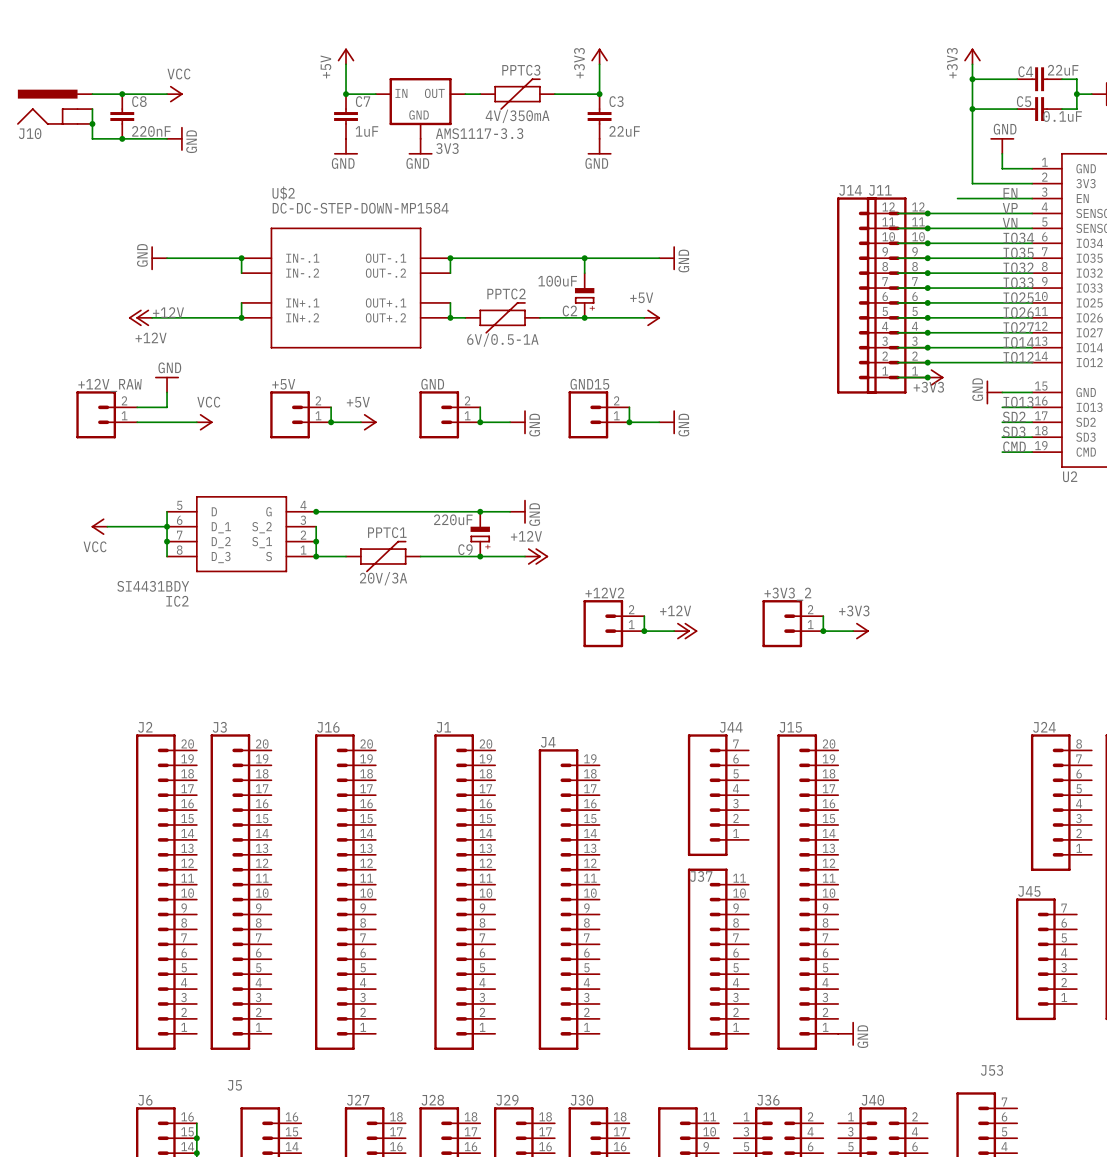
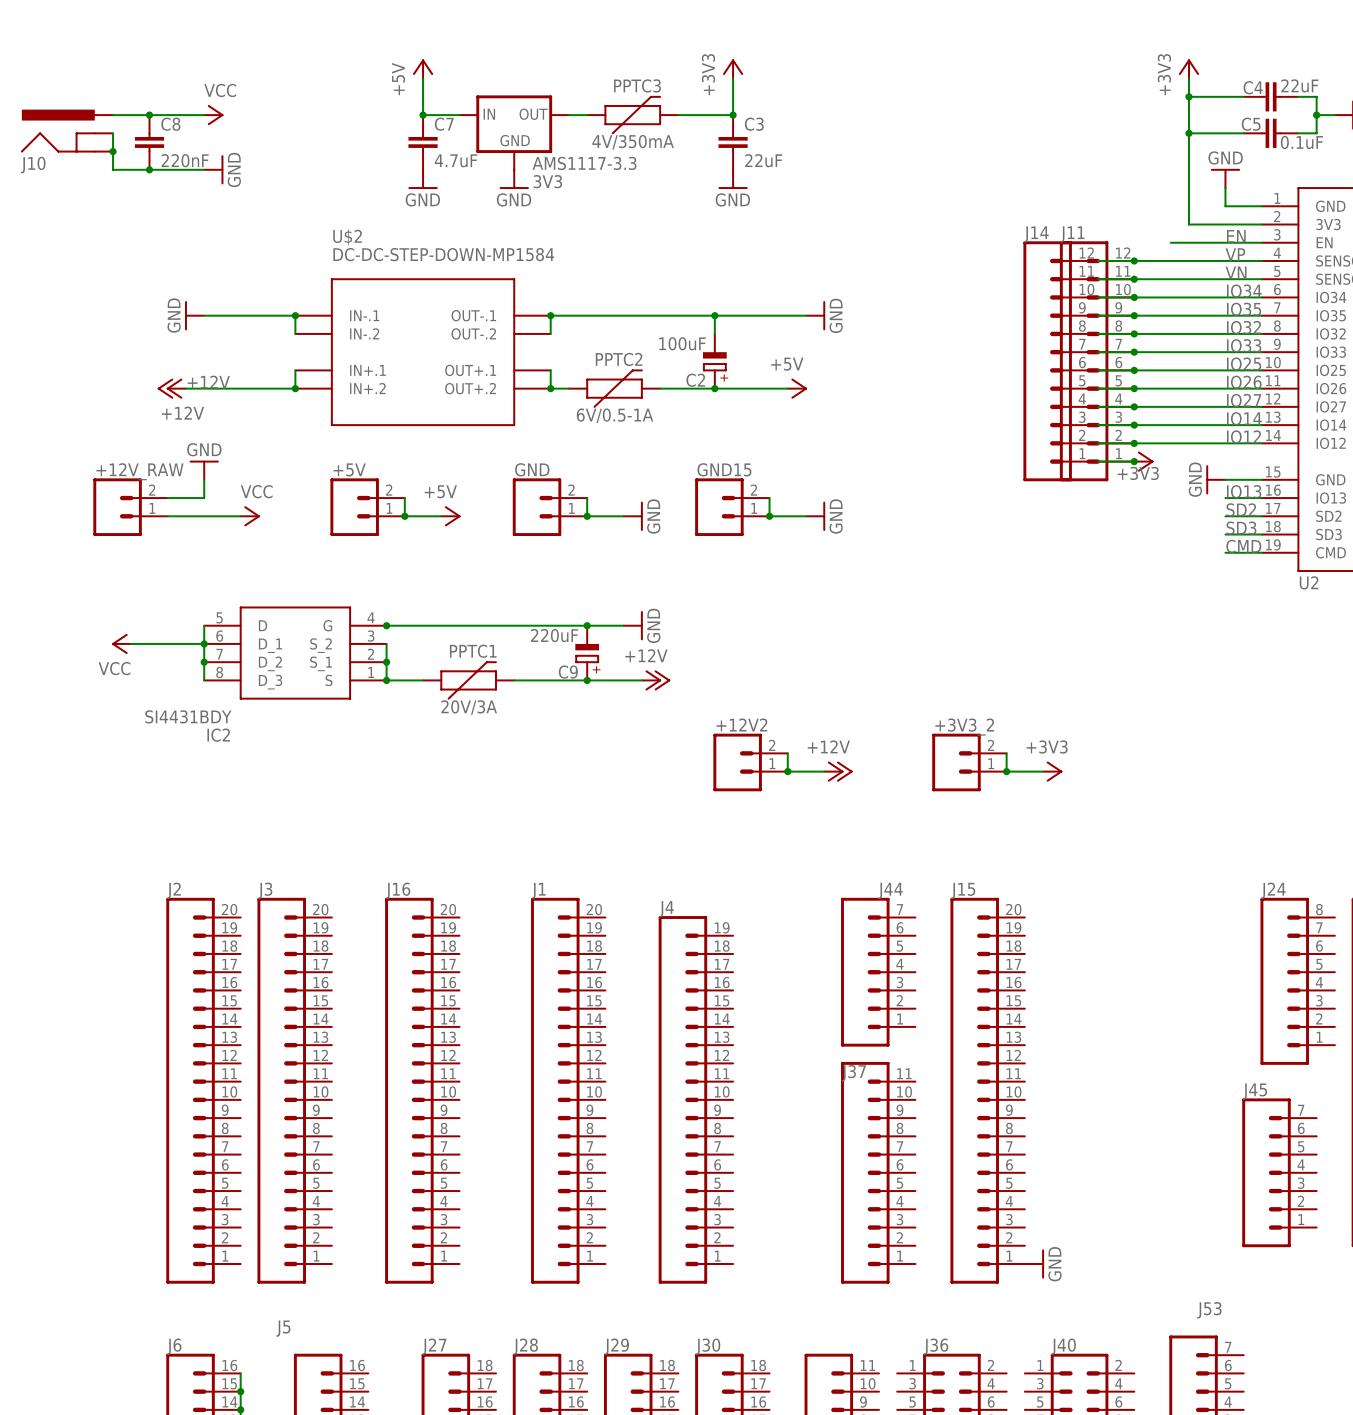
C7 value: 1uF (366, 131) -> 4.7uF (455, 160)

